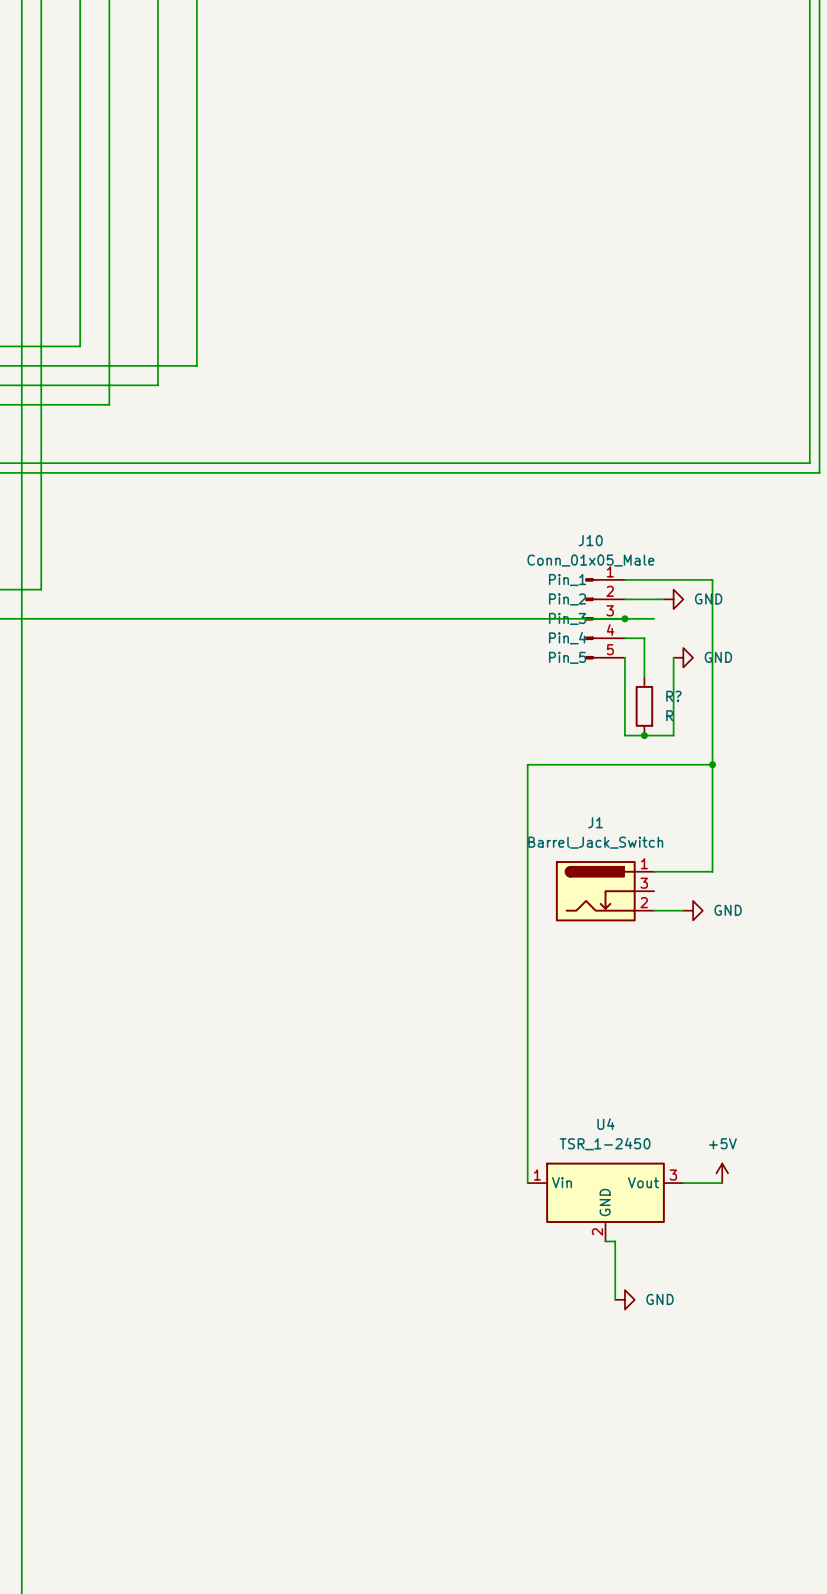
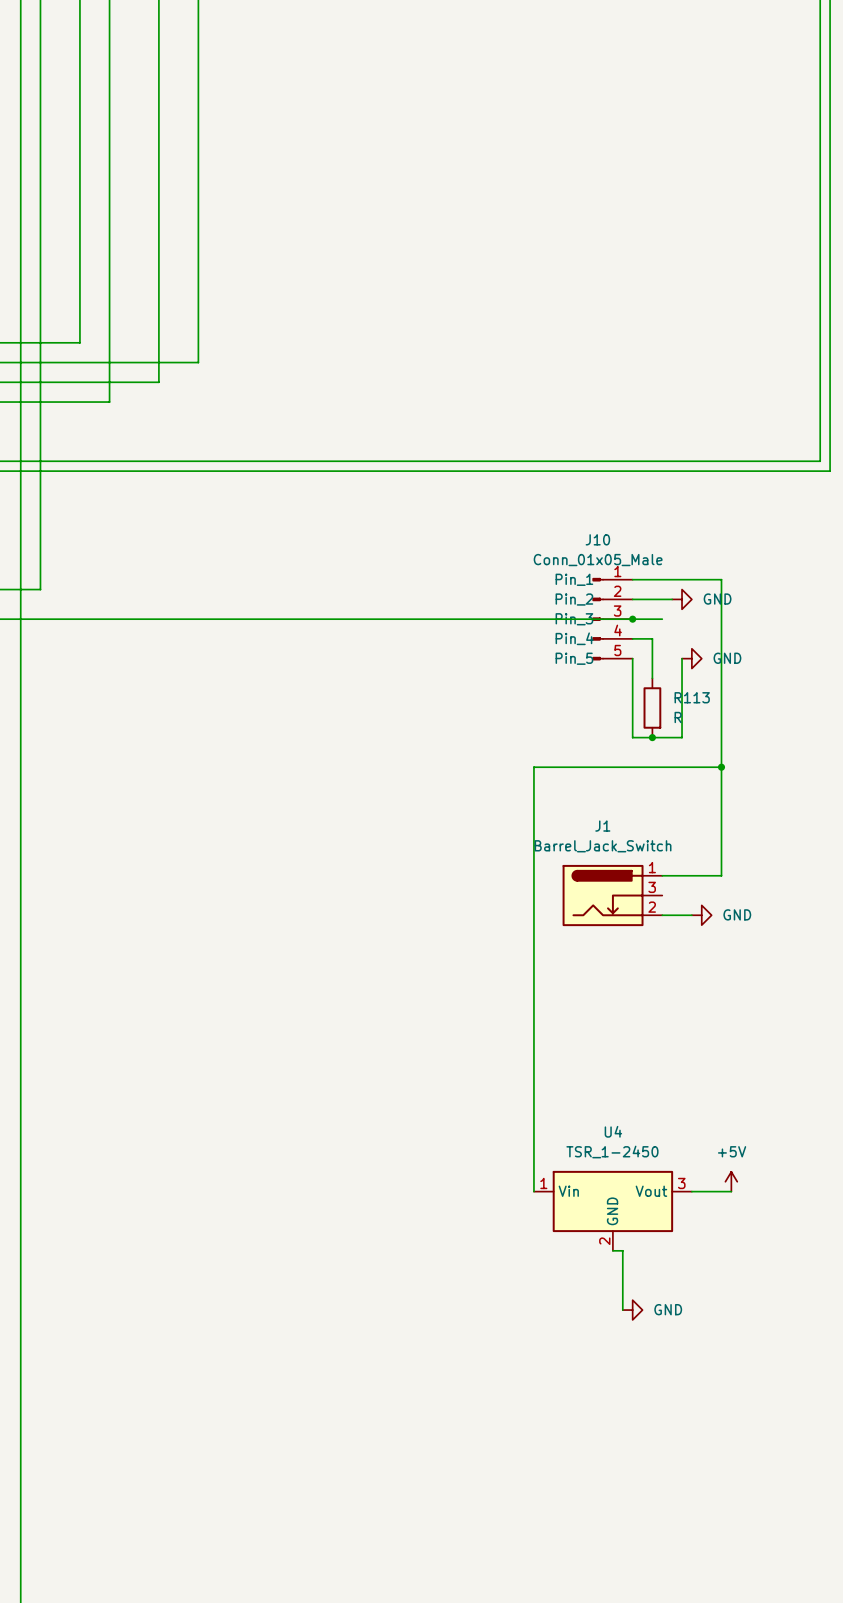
R? name: R? (673, 696) -> R113 (692, 697)

